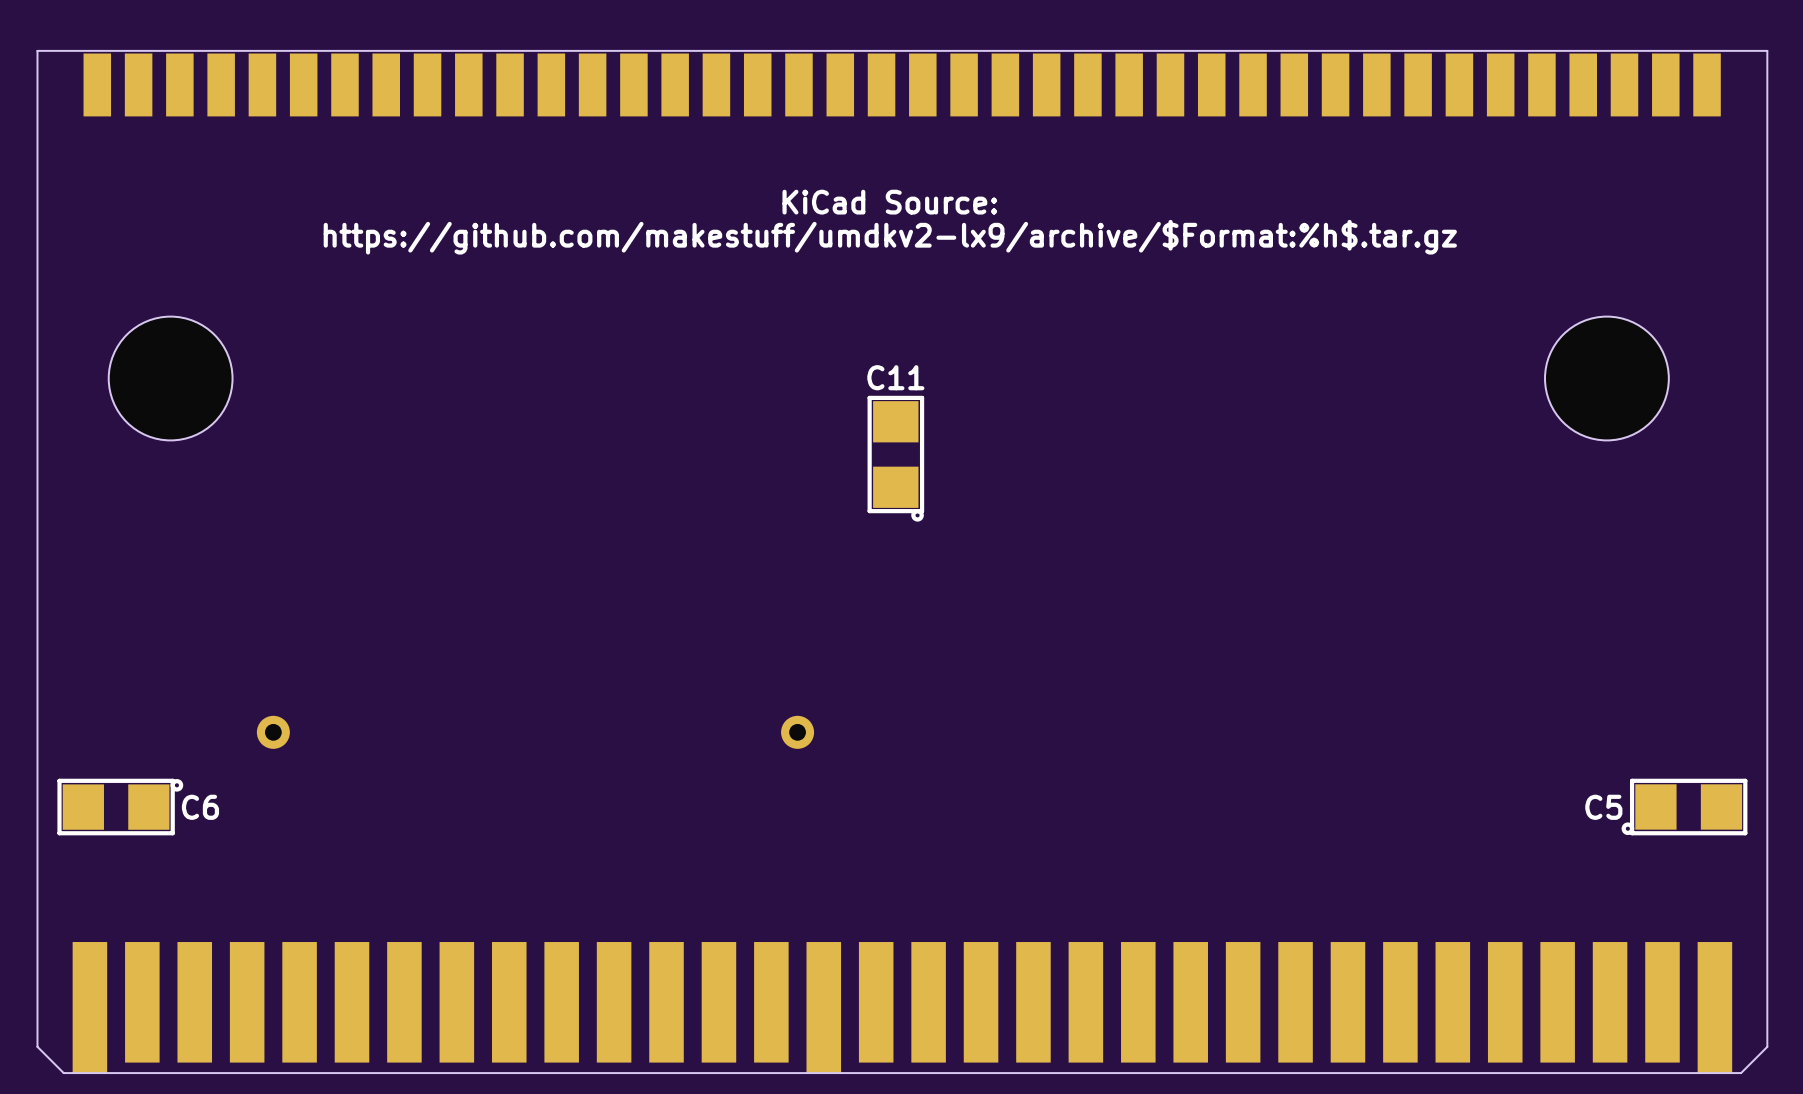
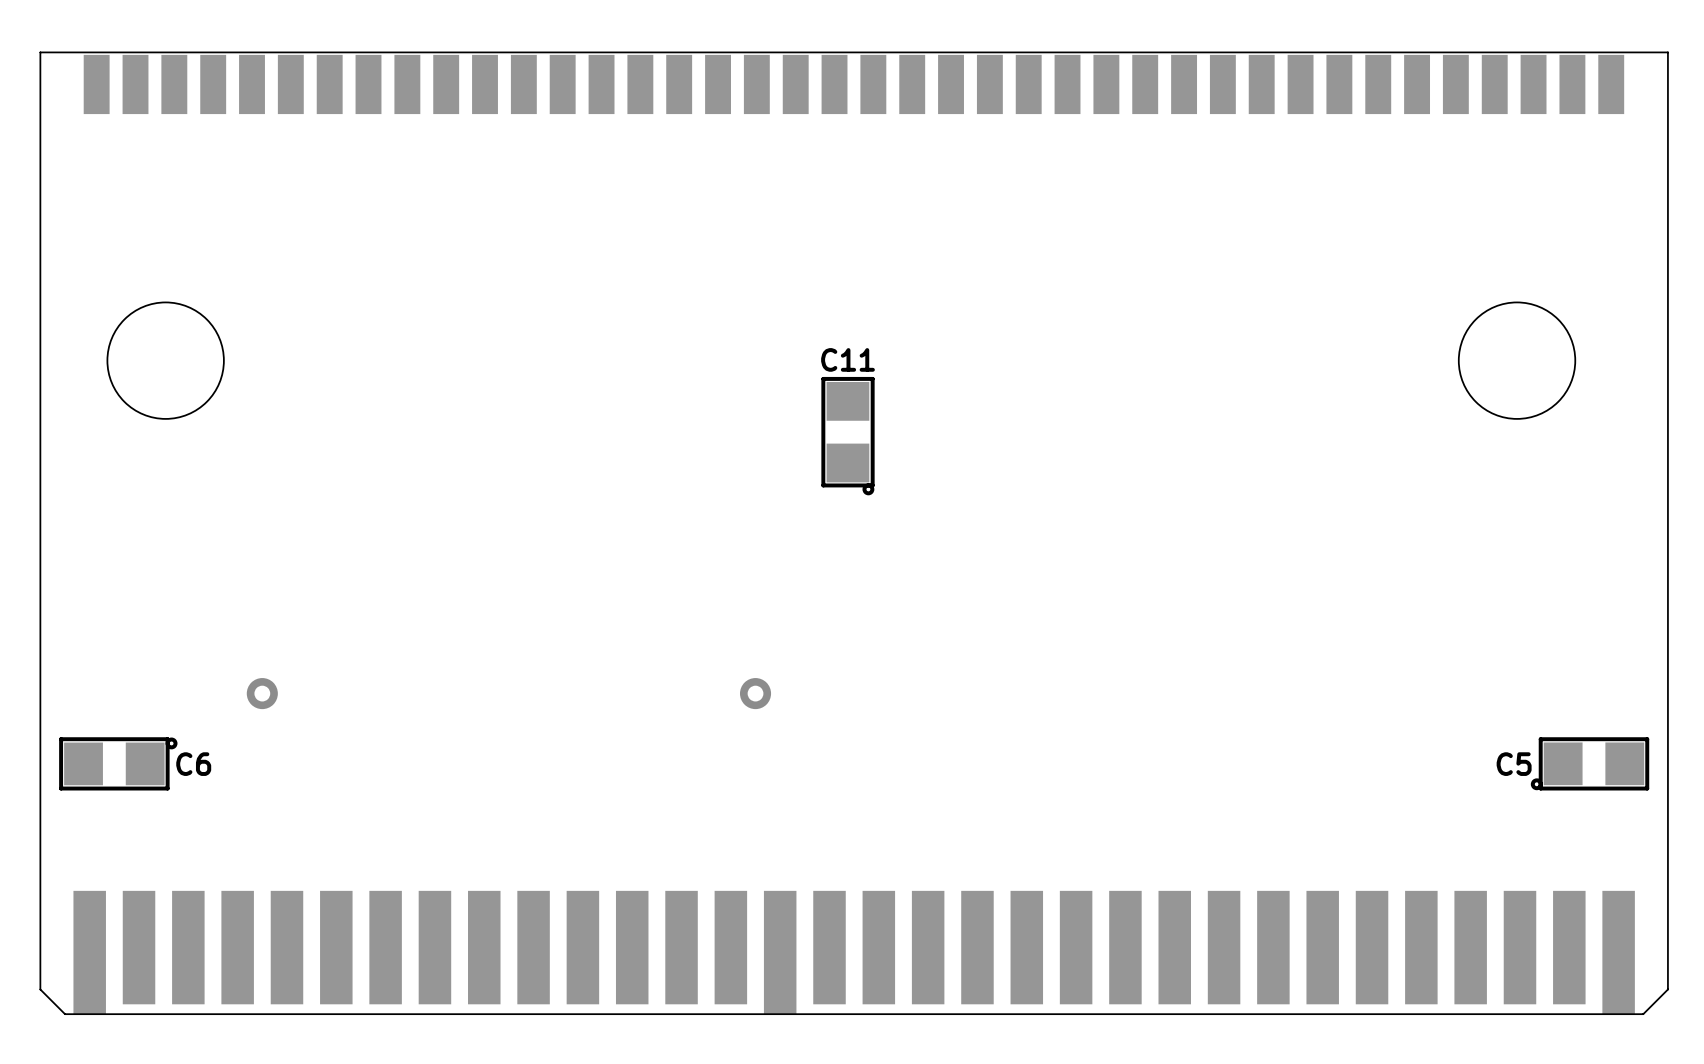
text: KiCad Source: (889, 202) -> none
text: https://github.com/makestuff/umdkv2-lx9/archive/$Format:%h$.tar.gz (890, 237) -> none

